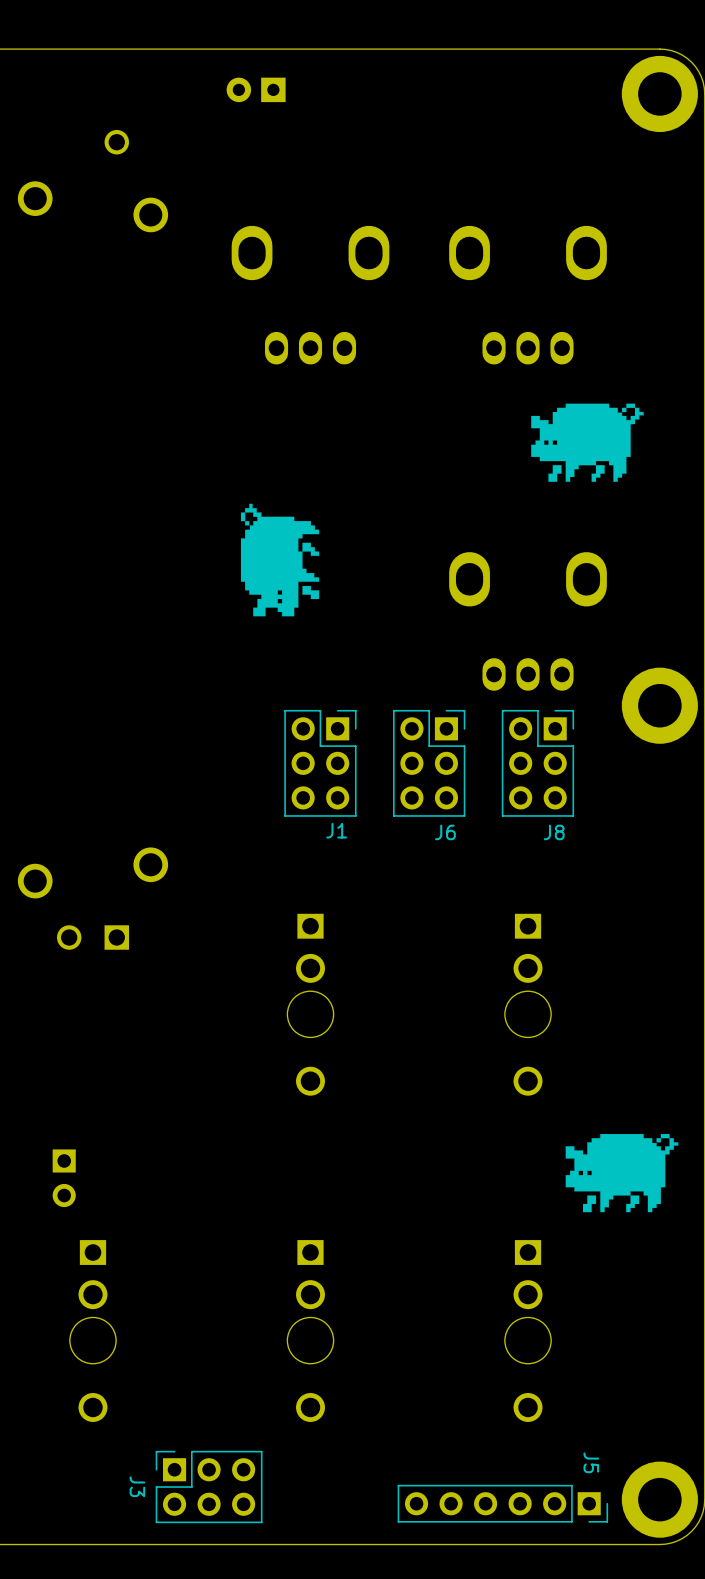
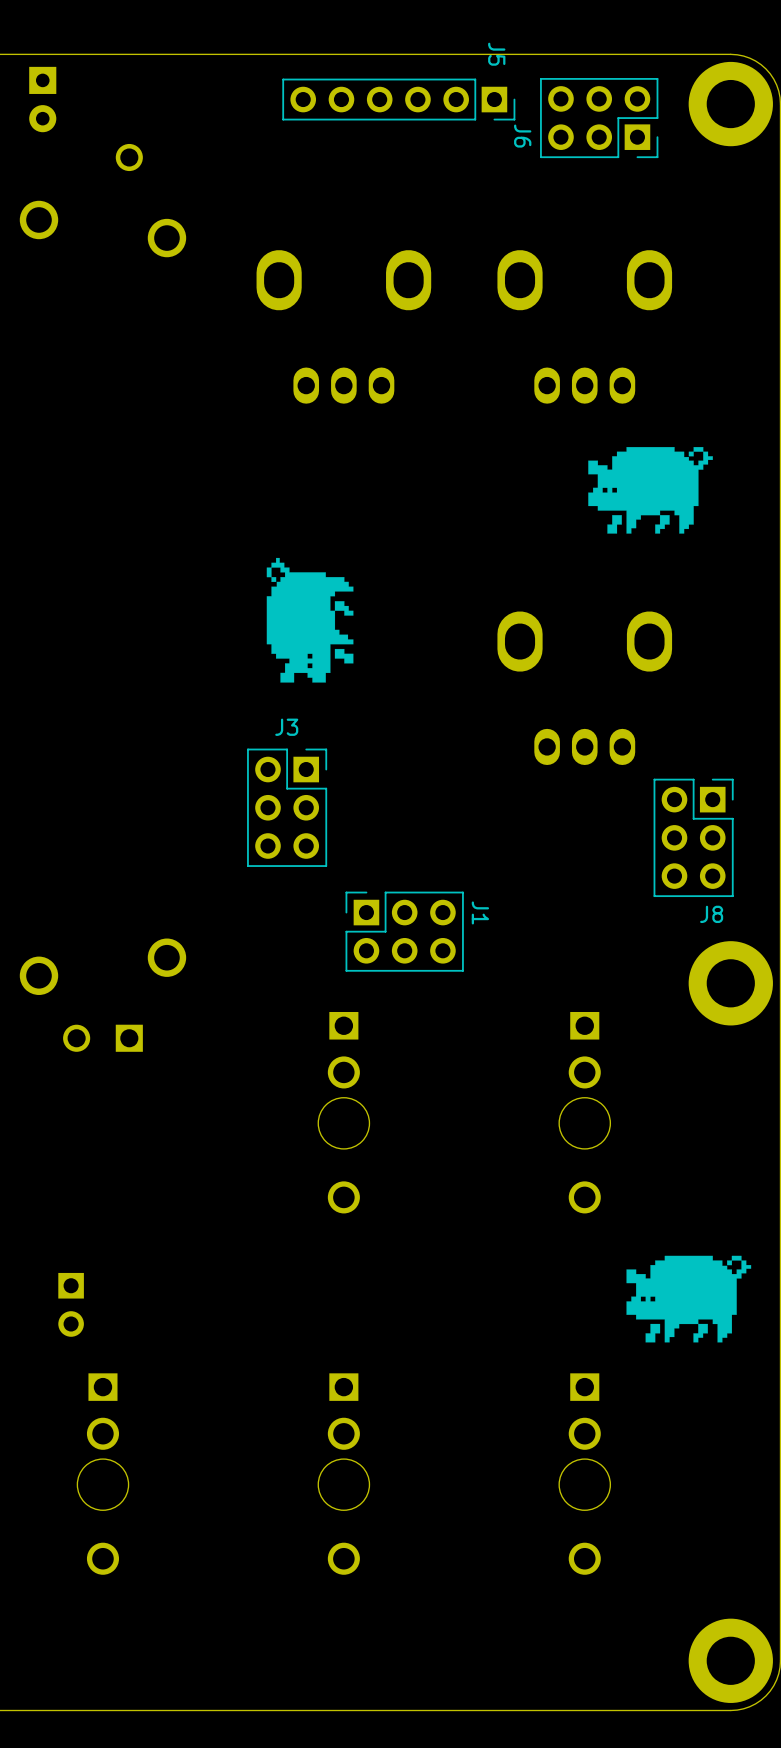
part rotation: 0° (256, 89) -> 90° counterclockwise (42, 99)
part position: (256, 89) -> (42, 99)
part position: (659, 705) -> (730, 983)
J1 rotation: 0° (320, 763) -> 90° counterclockwise (404, 931)
J1 position: (320, 763) -> (404, 931)
J6 rotation: 0° (429, 763) -> 90° clockwise (599, 118)
J6 position: (429, 763) -> (599, 118)
J8 position: (537, 763) -> (693, 837)
J3 rotation: 0° (209, 1487) -> 90° clockwise (287, 807)
J3 position: (209, 1487) -> (287, 807)
J5 position: (502, 1503) -> (398, 99)

